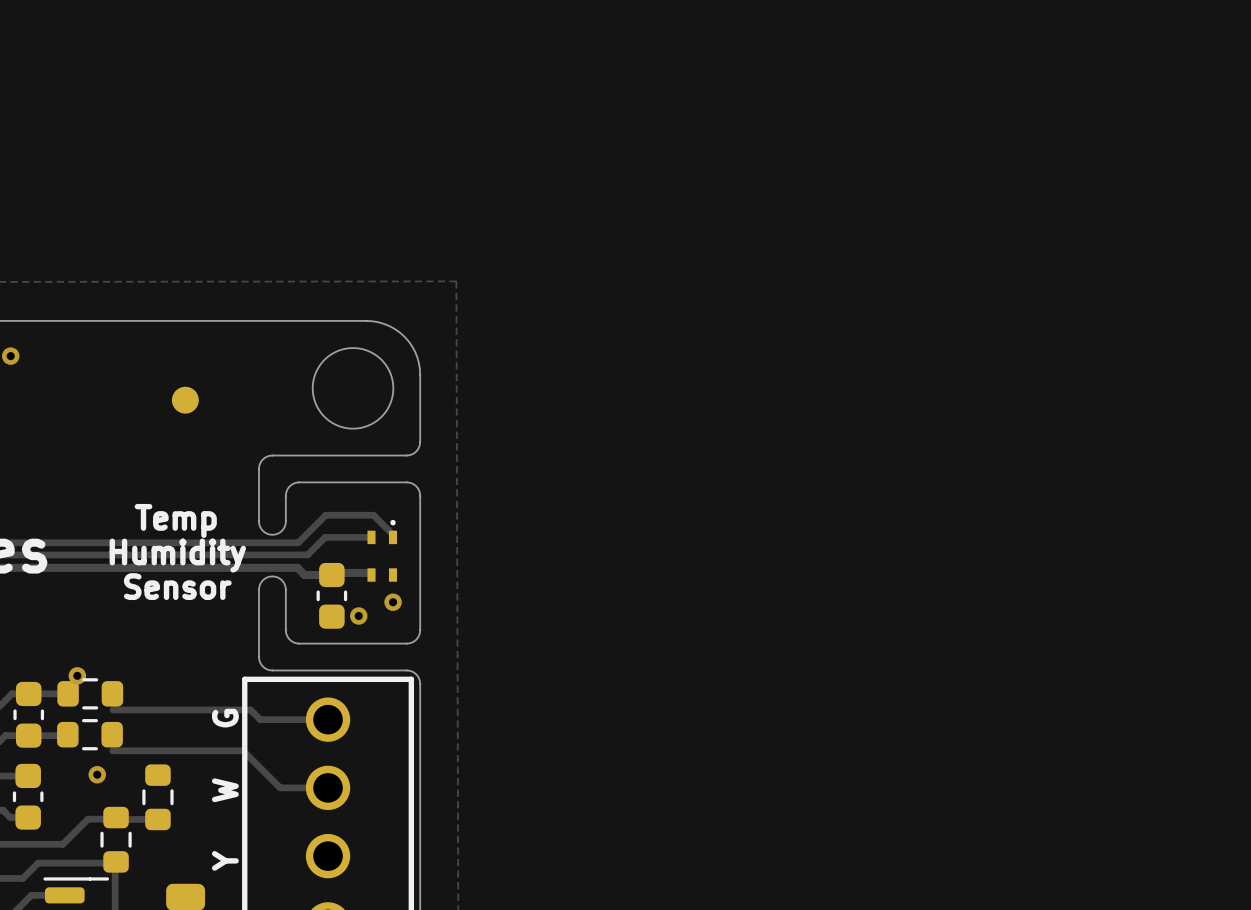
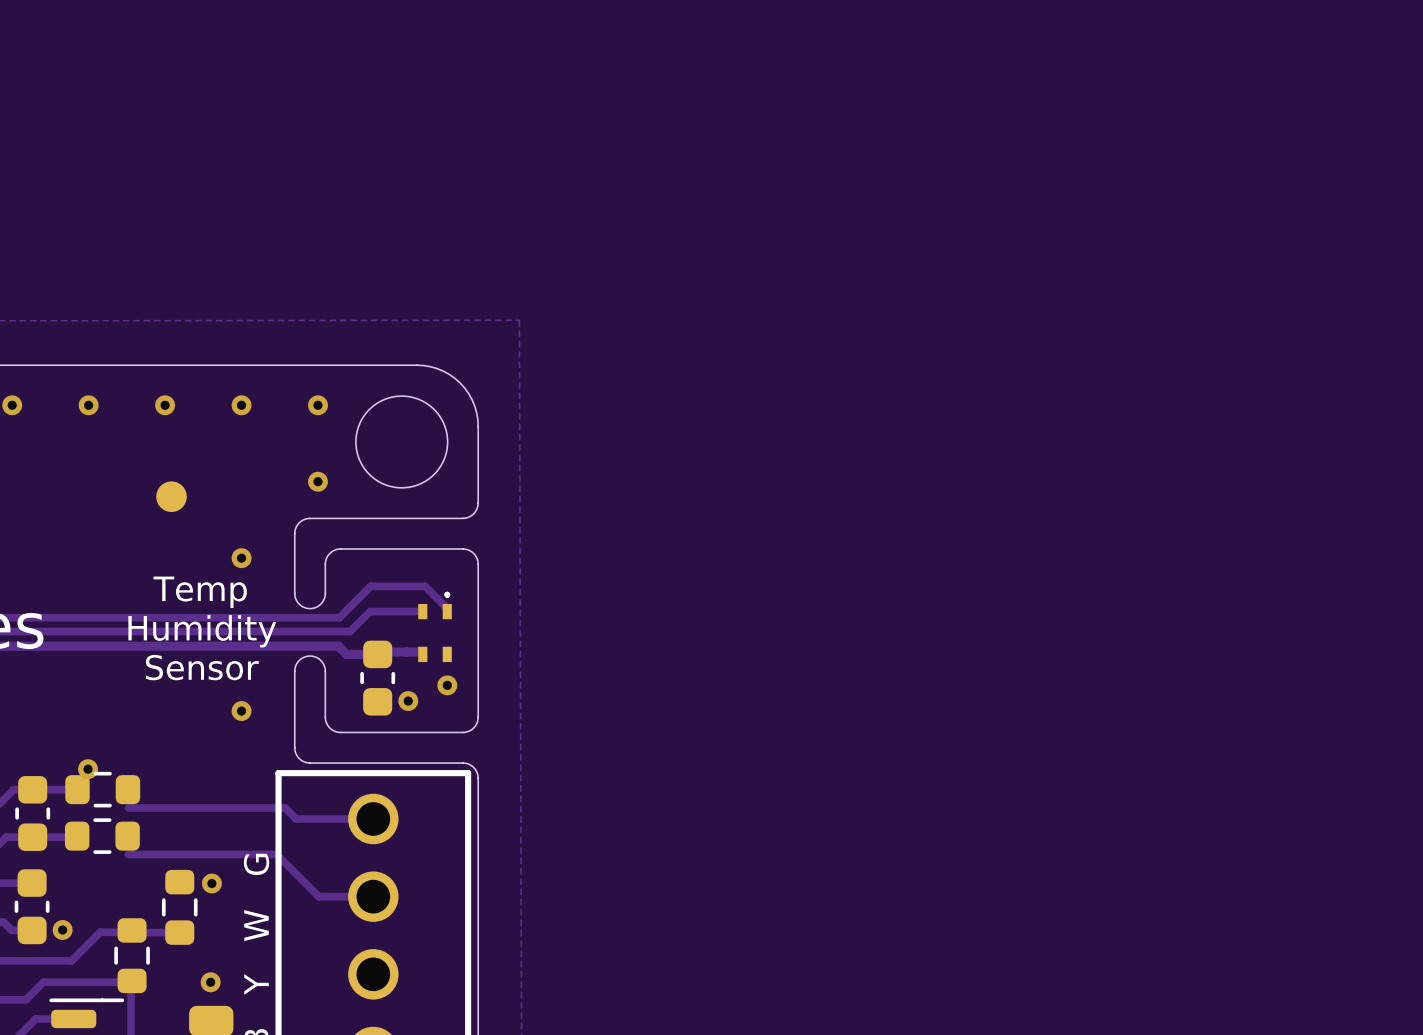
via: none -> (88, 405)
via: none -> (165, 405)
via: none -> (241, 405)
via: none -> (317, 405)
part position: (185, 400) -> (171, 496)
via: none -> (317, 481)
via: none -> (241, 558)
via: none -> (241, 711)
via: (97, 774) -> none
via: none -> (211, 883)
via: none -> (62, 930)
via: none -> (210, 982)

